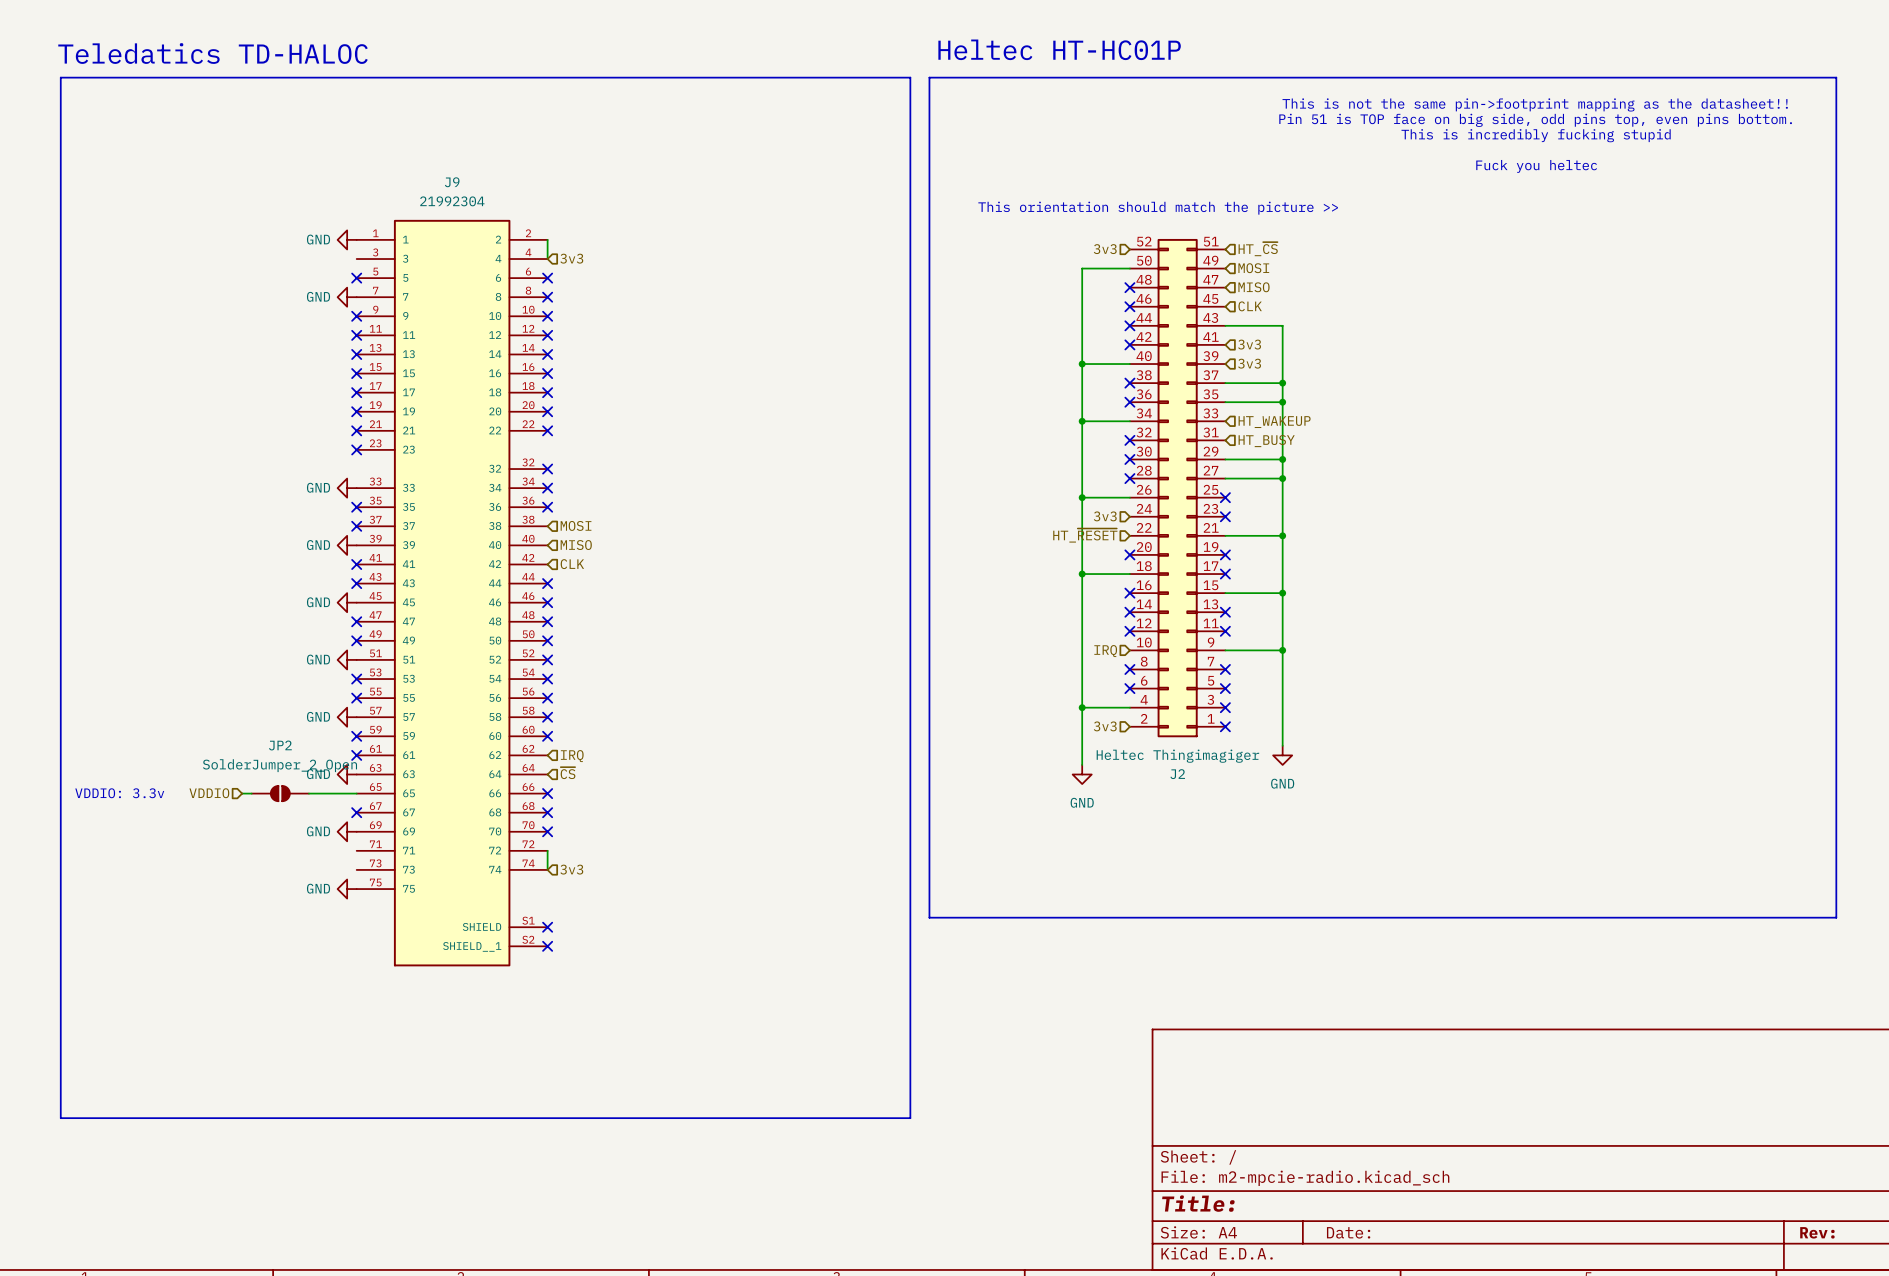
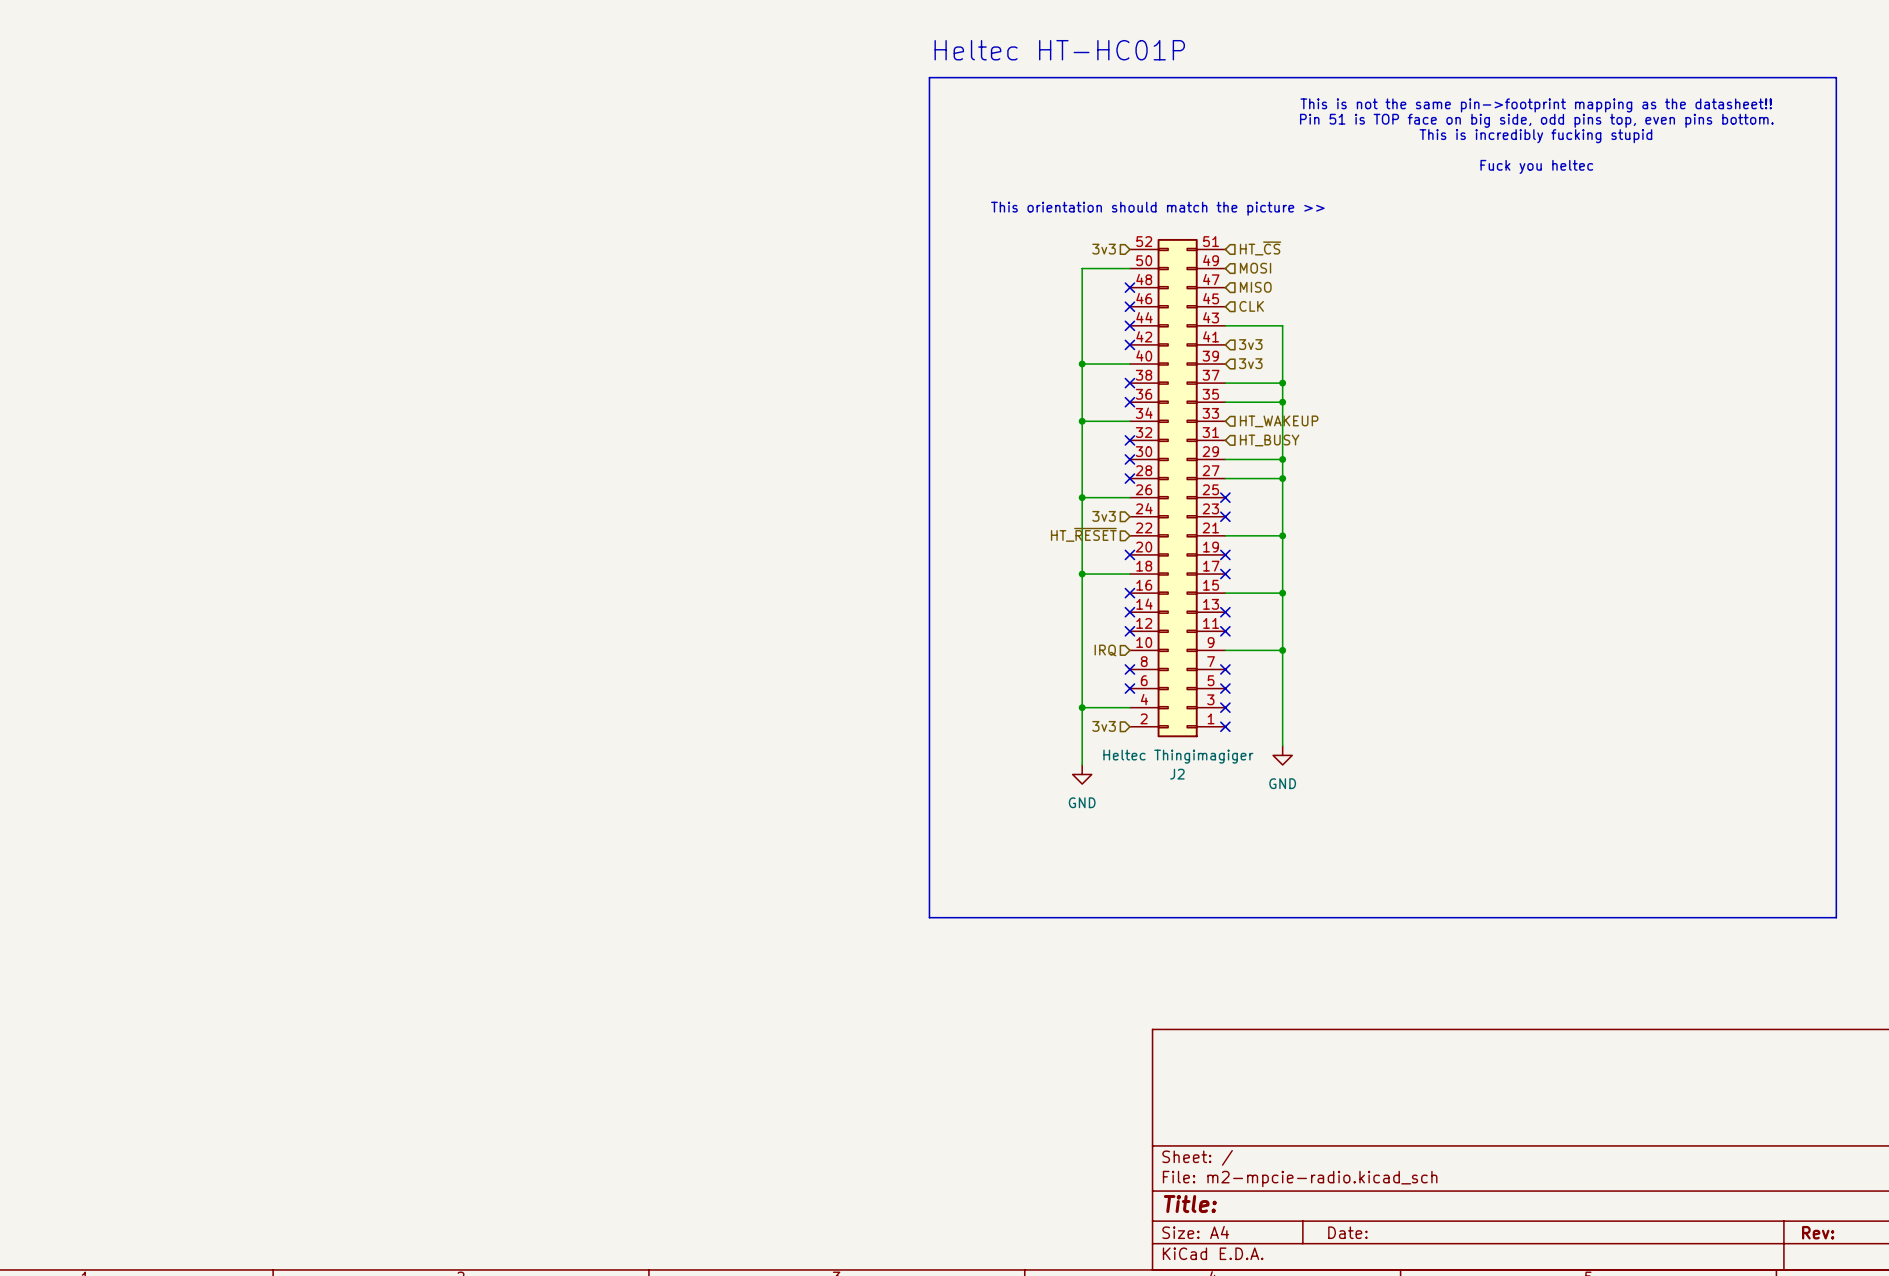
text: Teledatics TD-HALOC (212, 53) -> none
line: (60, 77) (910, 77) (910, 1118) (60, 1118) (60, 77) -> none
power symbol: GND (347, 239) -> none
wire: (547, 239) (547, 259) -> none
hierarchical label: 3v3 (571, 258) -> none
no-connect mark: (356, 278) -> none
no-connect mark: (547, 278) -> none
power symbol: GND (347, 297) -> none
no-connect mark: (547, 297) -> none
no-connect mark: (356, 316) -> none
no-connect mark: (547, 316) -> none
no-connect mark: (356, 335) -> none
no-connect mark: (547, 335) -> none
no-connect mark: (356, 354) -> none
no-connect mark: (547, 354) -> none
no-connect mark: (356, 373) -> none
no-connect mark: (547, 373) -> none
no-connect mark: (356, 392) -> none
no-connect mark: (547, 392) -> none
no-connect mark: (356, 411) -> none
no-connect mark: (547, 411) -> none
no-connect mark: (356, 430) -> none
no-connect mark: (547, 430) -> none
no-connect mark: (356, 449) -> none
no-connect mark: (547, 469) -> none
power symbol: GND (347, 488) -> none
no-connect mark: (547, 488) -> none
no-connect mark: (356, 507) -> none
no-connect mark: (547, 507) -> none
hierarchical label: MOSI (576, 525) -> none
no-connect mark: (356, 526) -> none
power symbol: GND (347, 545) -> none
hierarchical label: MISO (576, 545) -> none
no-connect mark: (356, 564) -> none
hierarchical label: CLK (572, 564) -> none
no-connect mark: (356, 583) -> none
no-connect mark: (547, 583) -> none
J9: 21992304 (452, 593) -> none
power symbol: GND (347, 602) -> none
no-connect mark: (547, 602) -> none
no-connect mark: (356, 621) -> none
no-connect mark: (547, 621) -> none
no-connect mark: (356, 640) -> none
no-connect mark: (547, 640) -> none
power symbol: GND (347, 659) -> none
no-connect mark: (547, 659) -> none
no-connect mark: (356, 679) -> none
no-connect mark: (547, 679) -> none
no-connect mark: (356, 698) -> none
no-connect mark: (547, 698) -> none
power symbol: GND (347, 717) -> none
no-connect mark: (547, 717) -> none
no-connect mark: (356, 736) -> none
no-connect mark: (547, 736) -> none
no-connect mark: (356, 755) -> none
hierarchical label: IRQ (572, 756) -> none
hierarchical label: ~{CS} (568, 773) -> none
power symbol: GND (347, 774) -> none
text: VDDIO: 3.3v (119, 793) -> none
hierarchical label: VDDIO (209, 793) -> none
wire: (242, 793) (251, 793) -> none
JP2: SolderJumper_2_Open (280, 793) -> none
wire: (308, 793) (356, 793) -> none
no-connect mark: (547, 793) -> none
no-connect mark: (356, 812) -> none
no-connect mark: (547, 812) -> none
power symbol: GND (347, 831) -> none
no-connect mark: (547, 831) -> none
wire: (547, 850) (547, 869) -> none
hierarchical label: 3v3 (571, 869) -> none
power symbol: GND (347, 889) -> none
no-connect mark: (547, 927) -> none
no-connect mark: (547, 946) -> none

